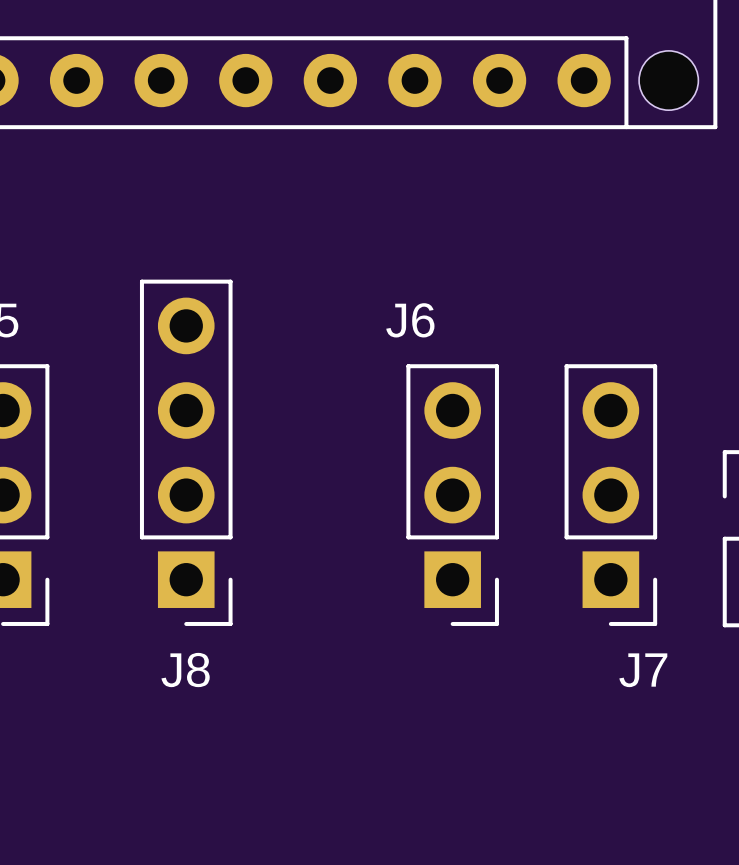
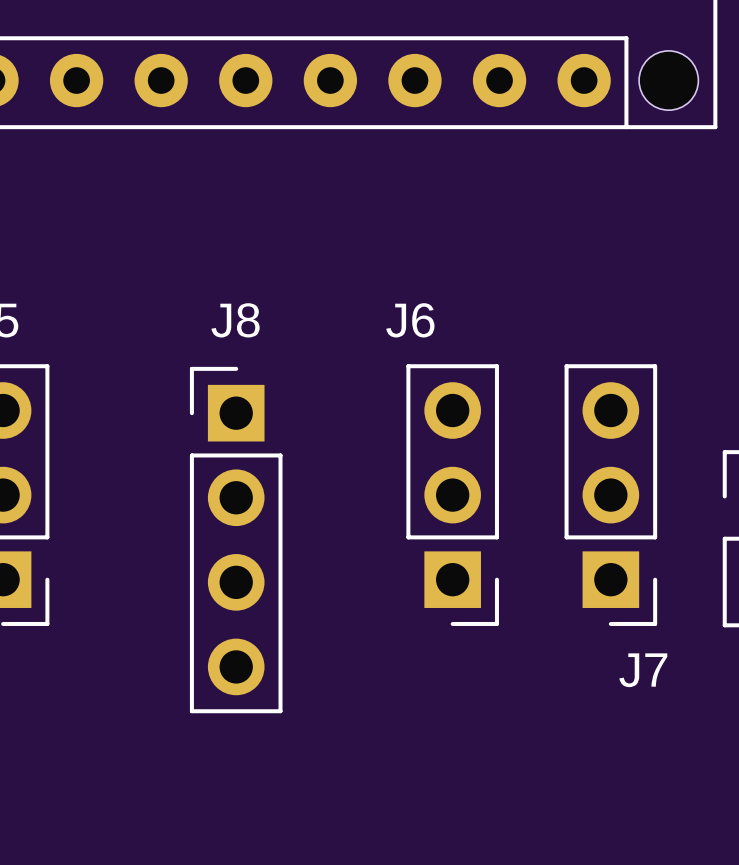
J8 rotation: 0° (186, 452) -> 180° (236, 540)

